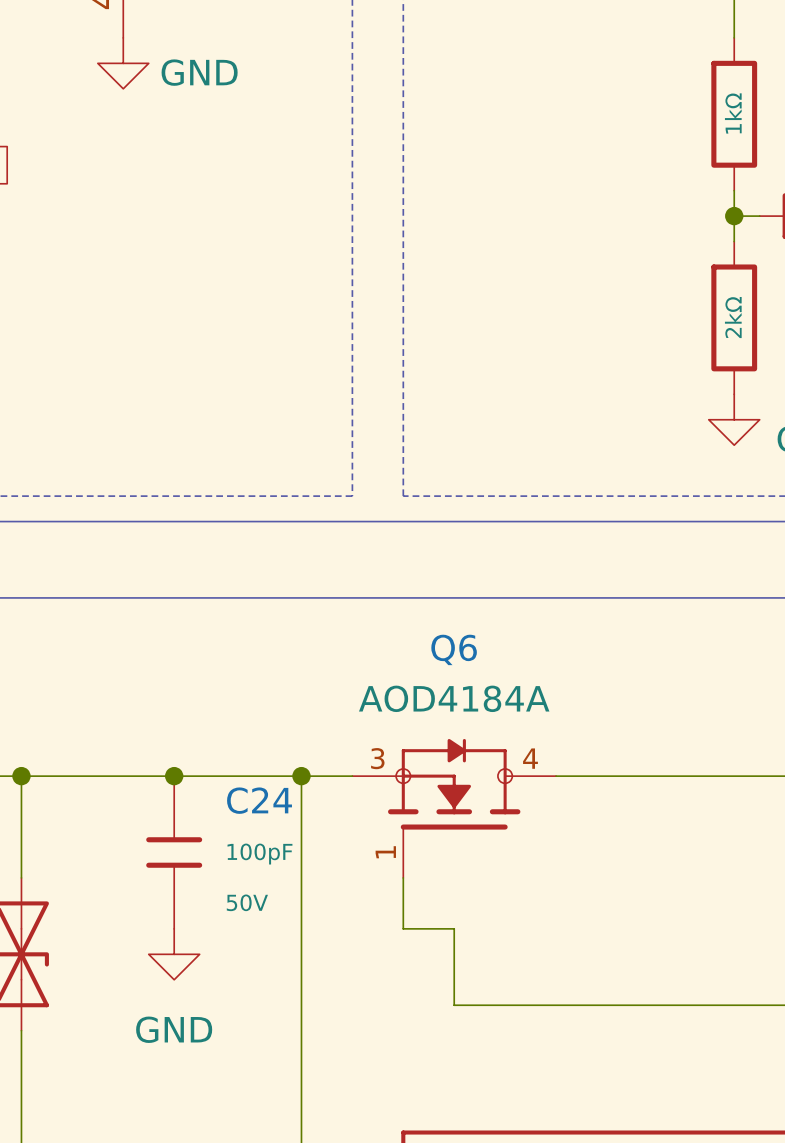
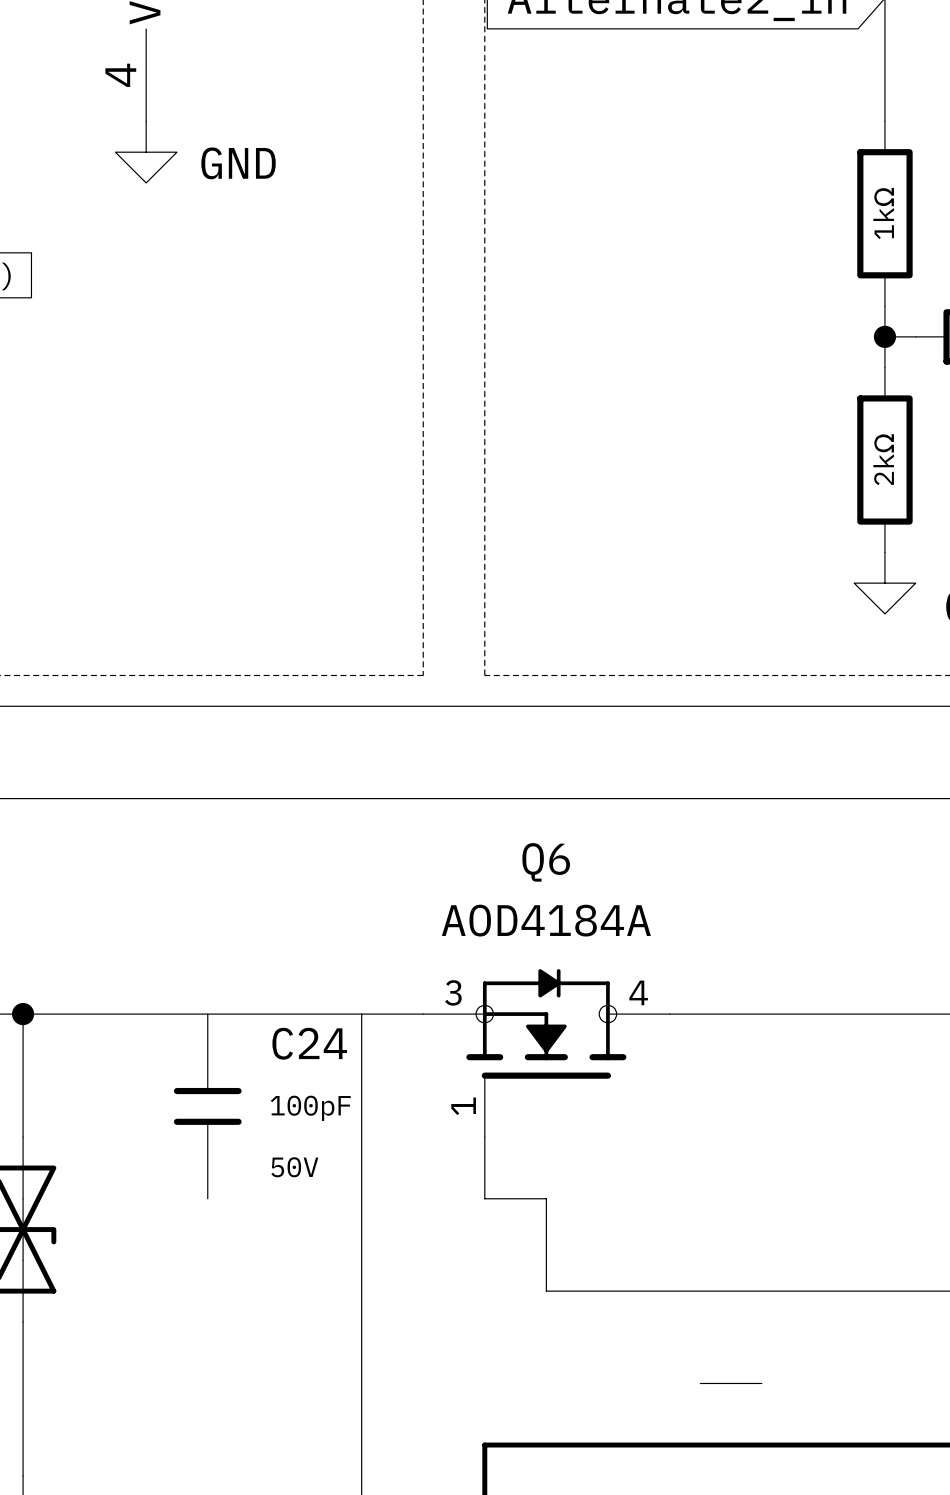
junction: (174, 776) -> none
junction: (301, 776) -> none
power symbol: GND (174, 954) -> none
wire: none -> (700, 1383) (761, 1383)

